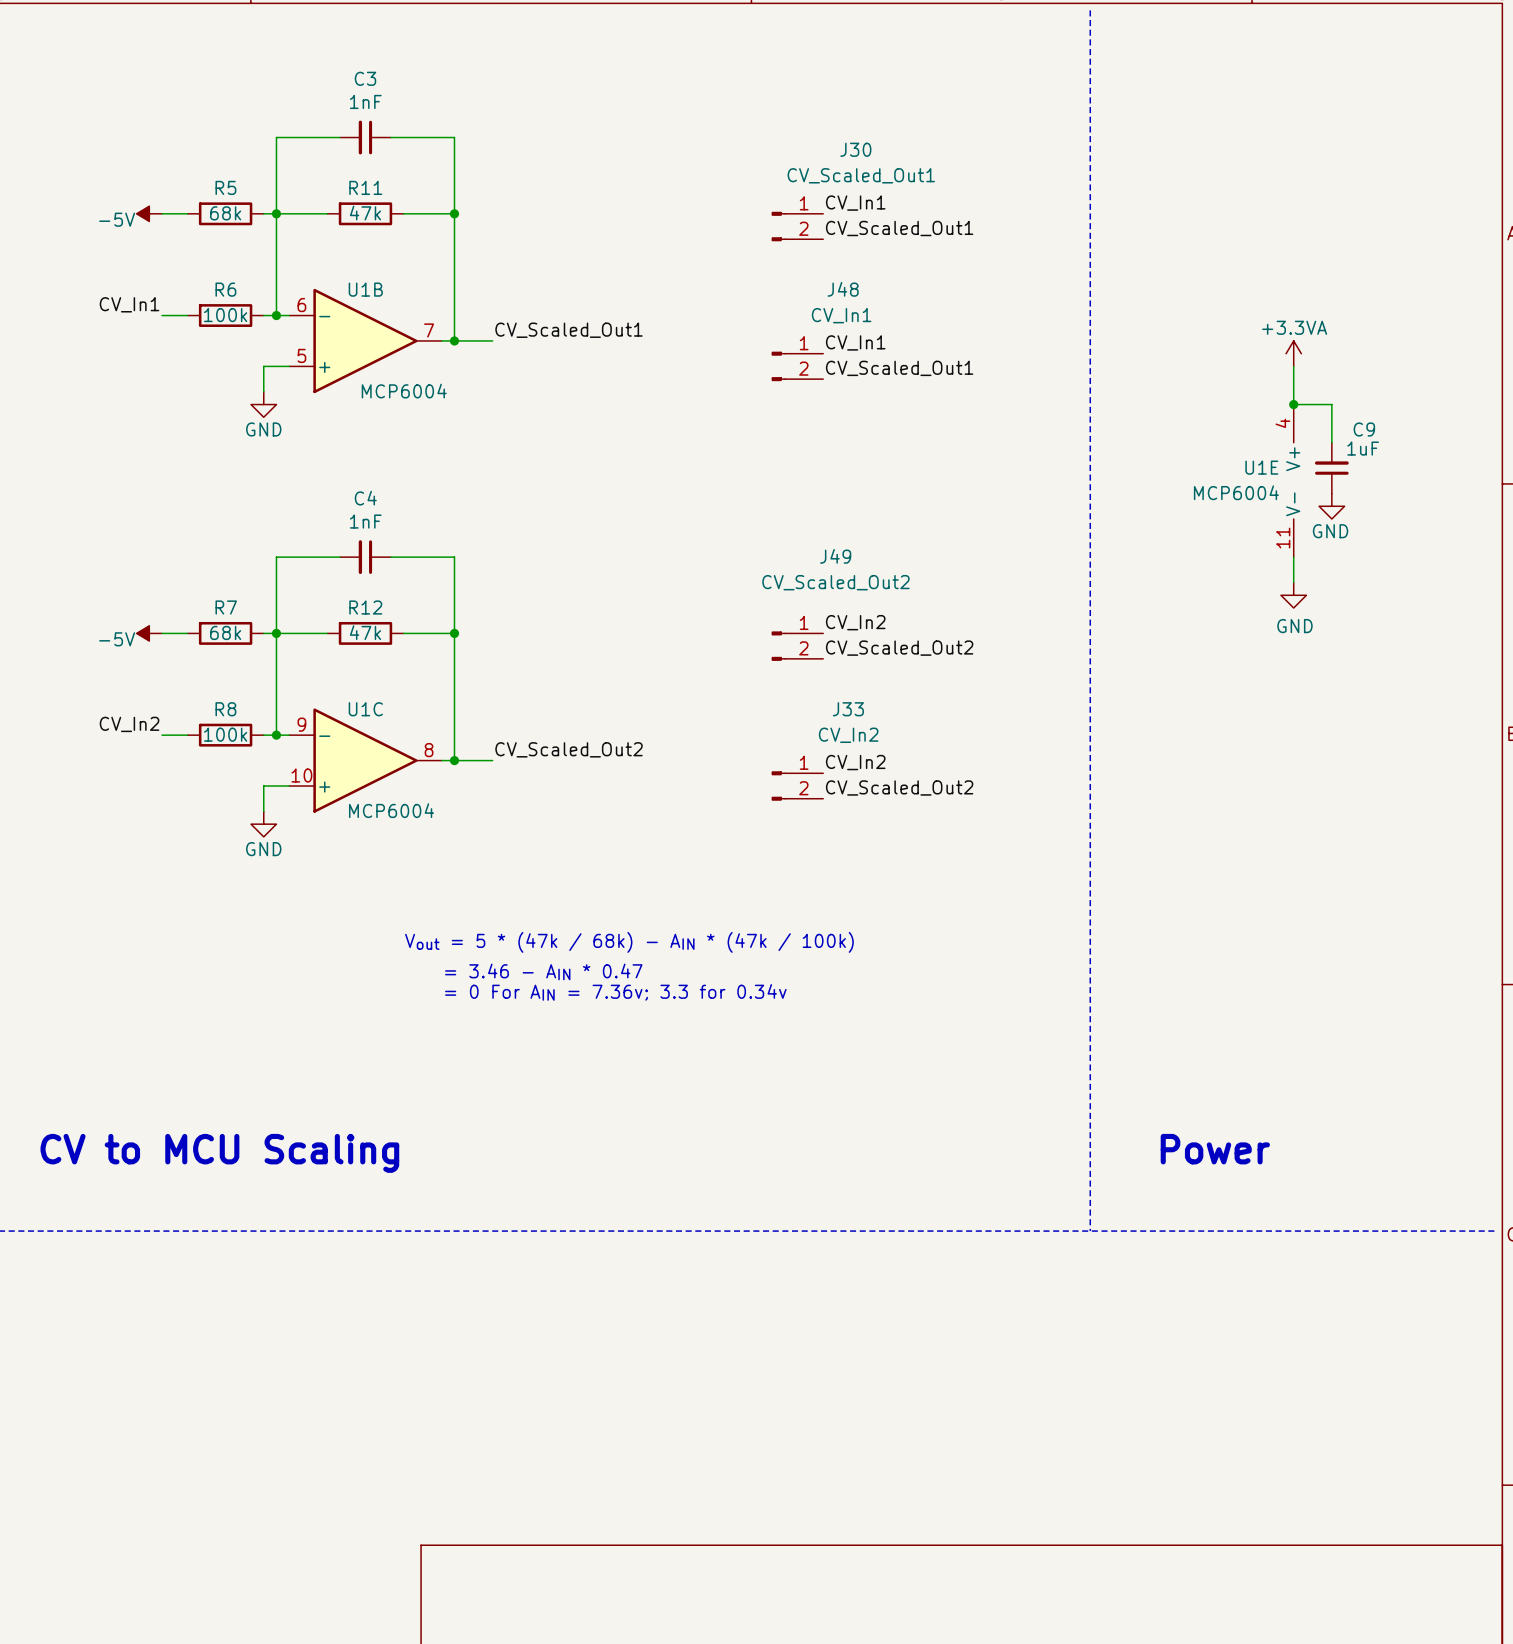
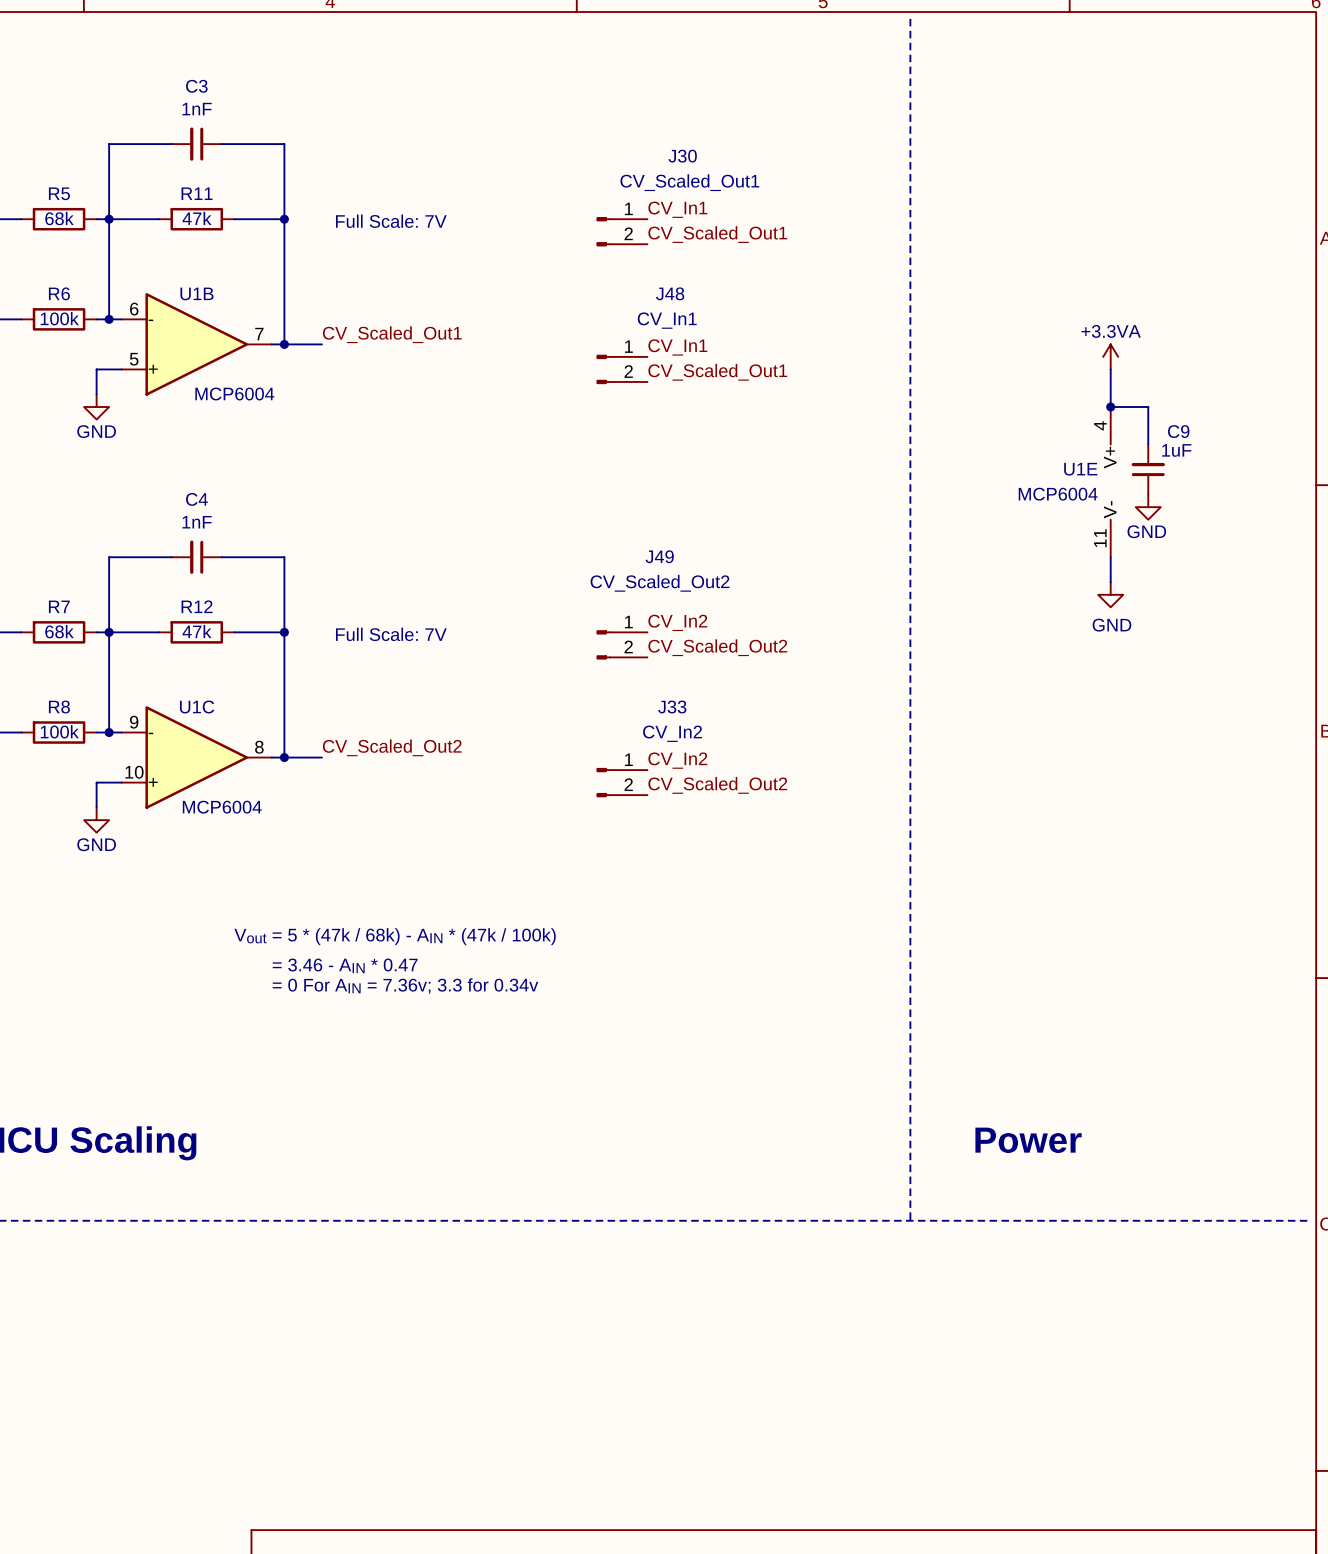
text: none -> Full Scale: 7V (391, 221)
text: none -> Full Scale: 7V (391, 634)

